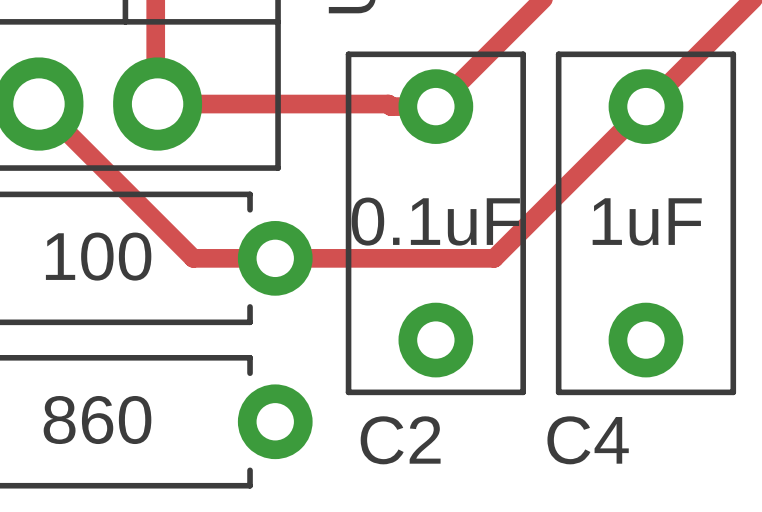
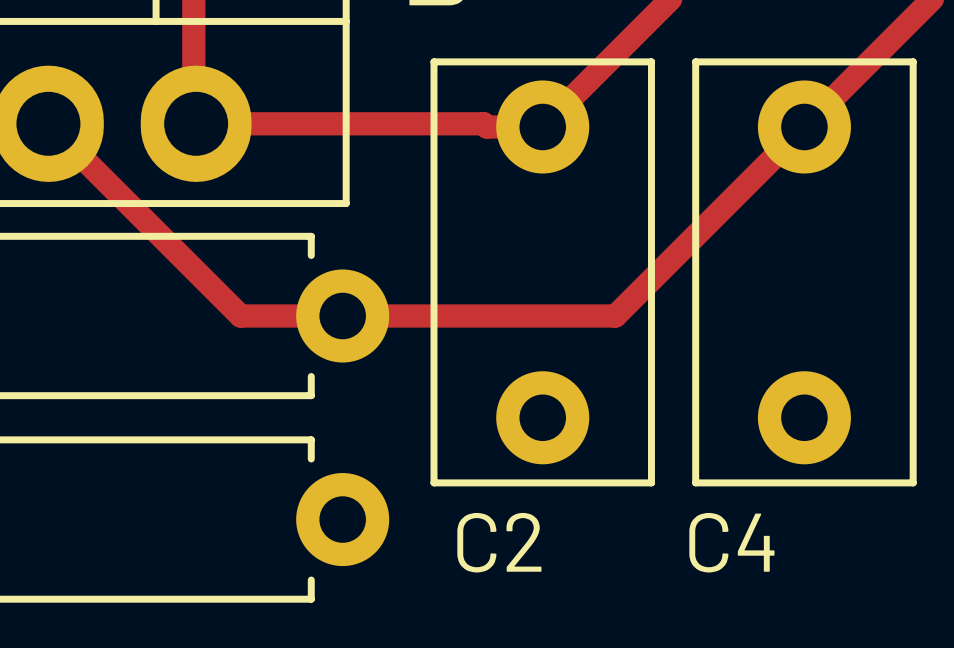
C2 value: 0.1uF (435, 221) -> none
C4 value: 1uF (647, 221) -> none
part value: 100 (98, 256) -> none
part value: 860 (97, 420) -> none

